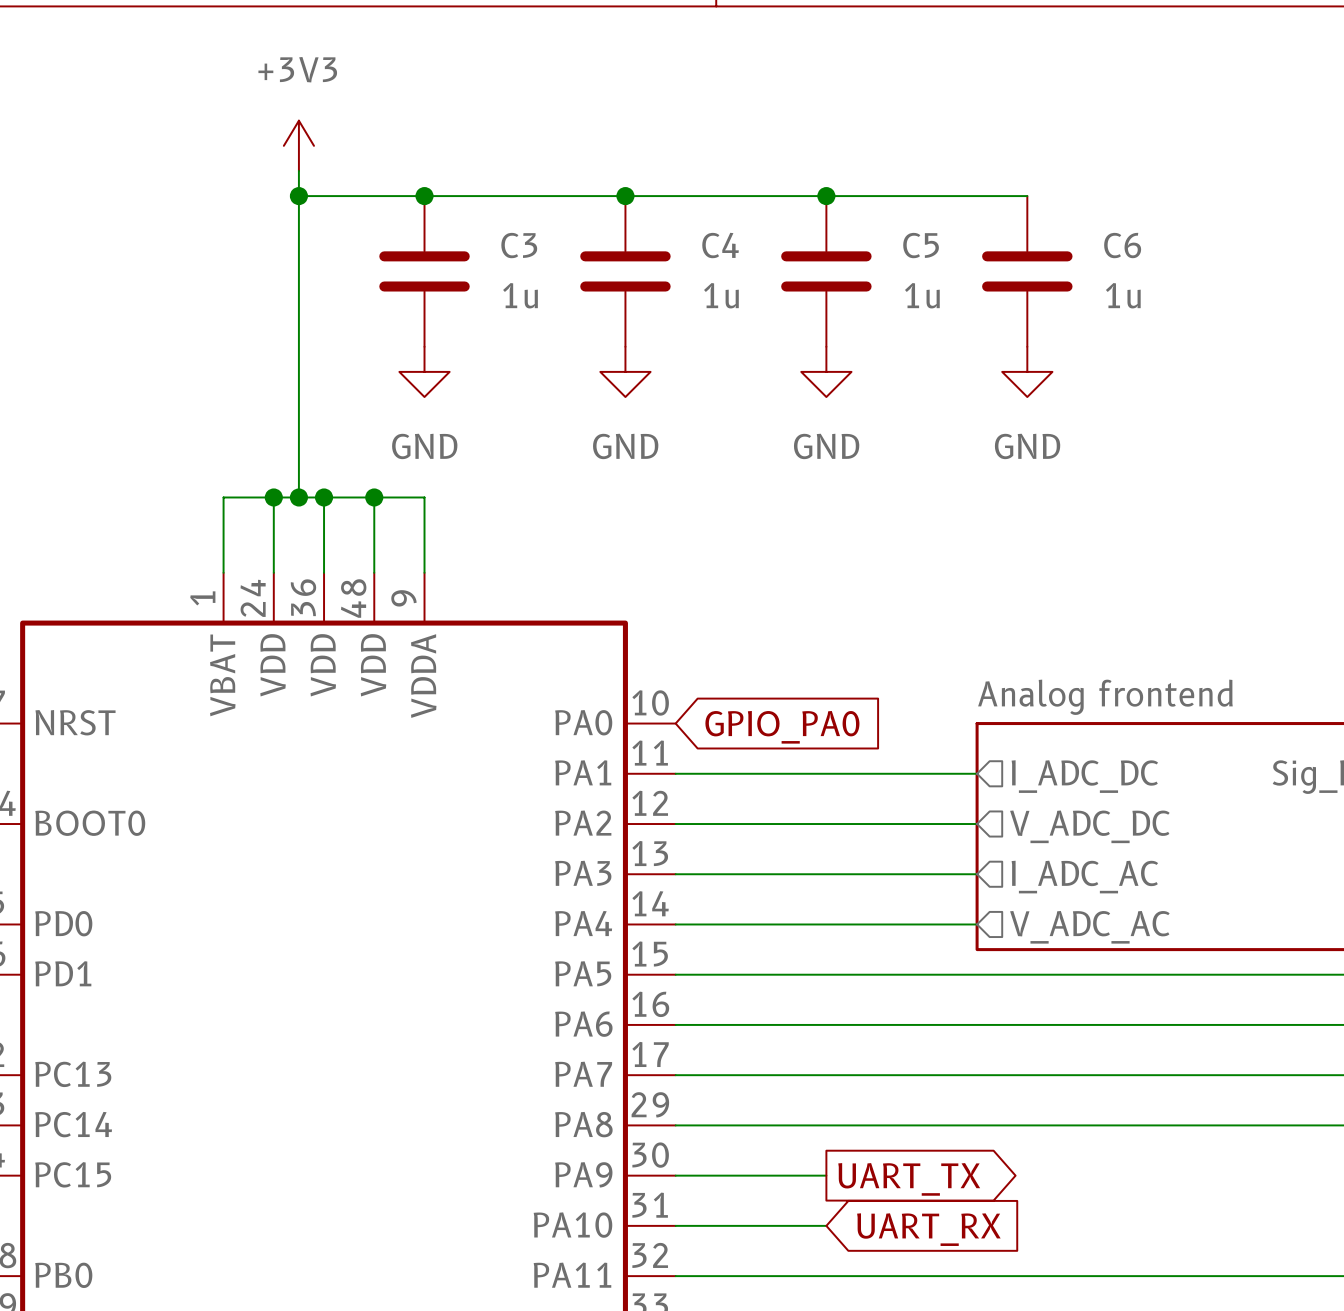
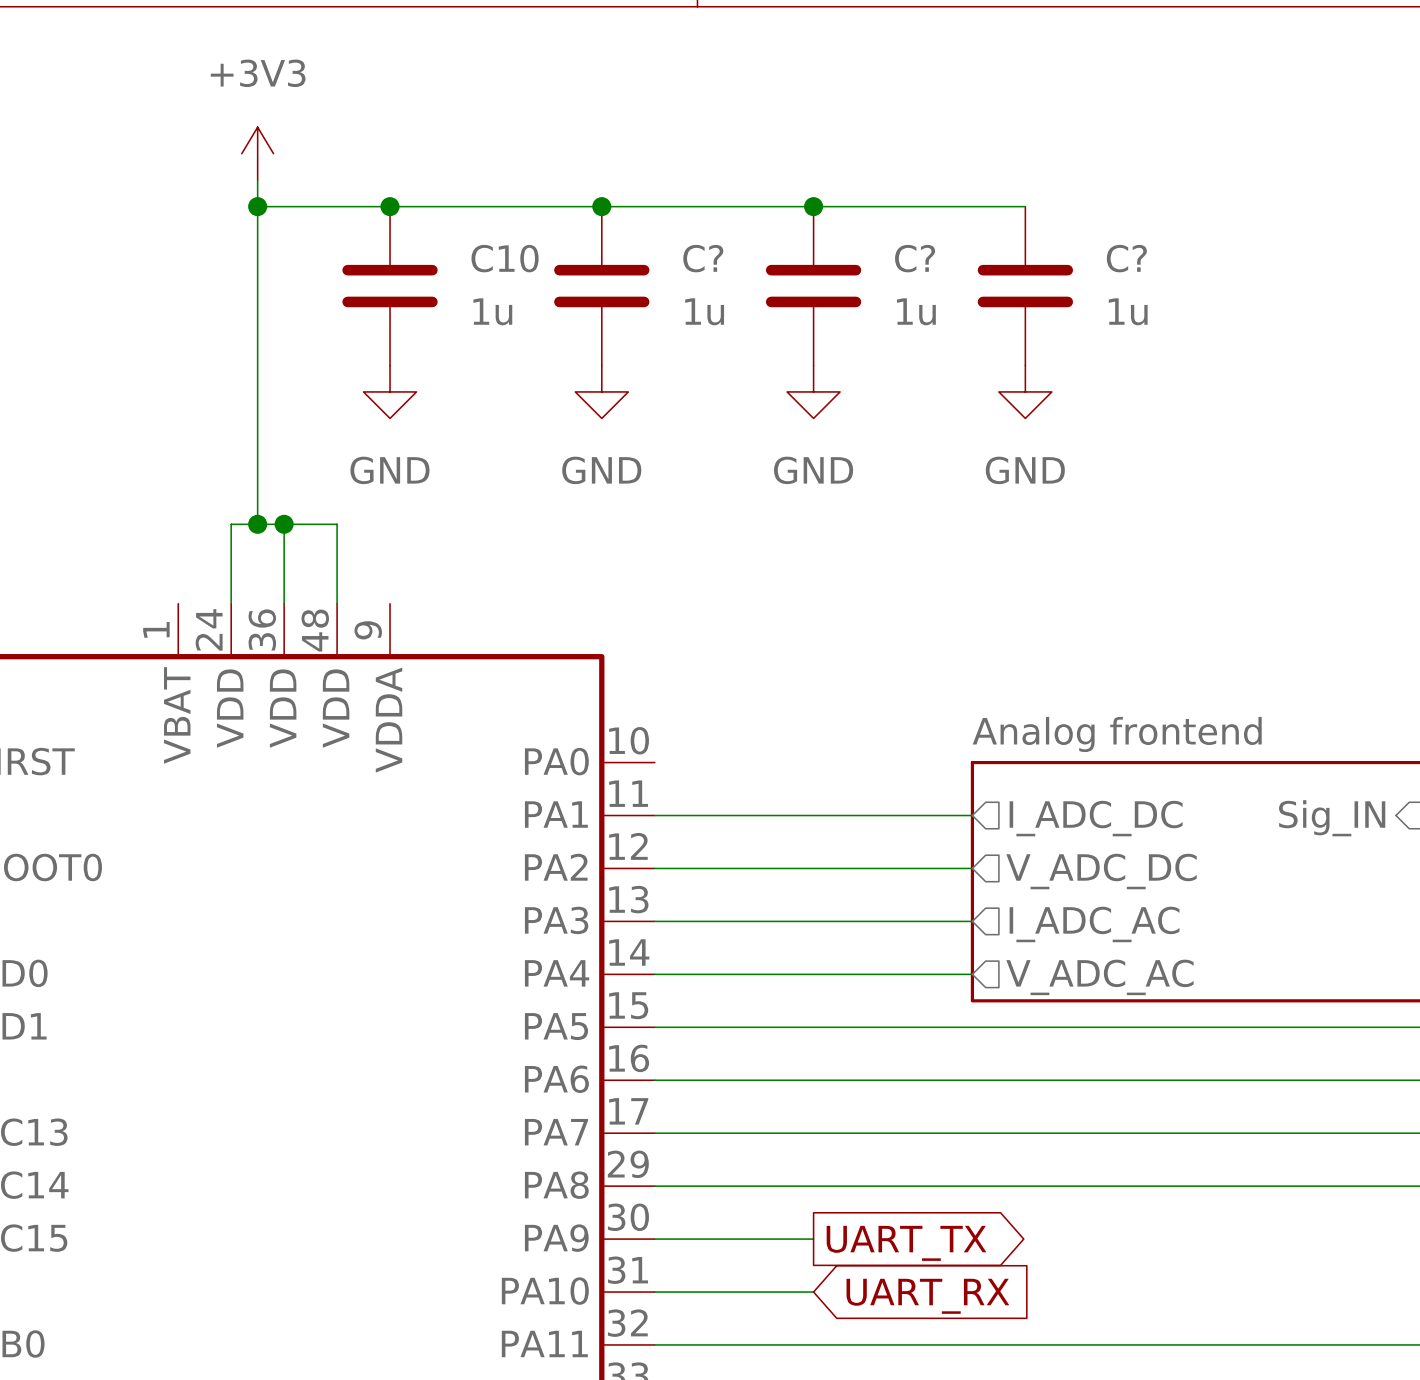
C3 name: C3 (519, 245) -> C10 (505, 258)
C4 name: C4 (720, 245) -> C? (703, 258)
C5 name: C5 (921, 245) -> C? (915, 258)
C6 name: C6 (1122, 245) -> C? (1126, 258)
wire: (273, 497) (223, 497) (223, 572) -> none
junction: (273, 497) -> none
wire: (374, 497) (424, 497) (424, 572) -> none
junction: (374, 497) -> none
global label: GPIO_PA0 (782, 727) -> none

